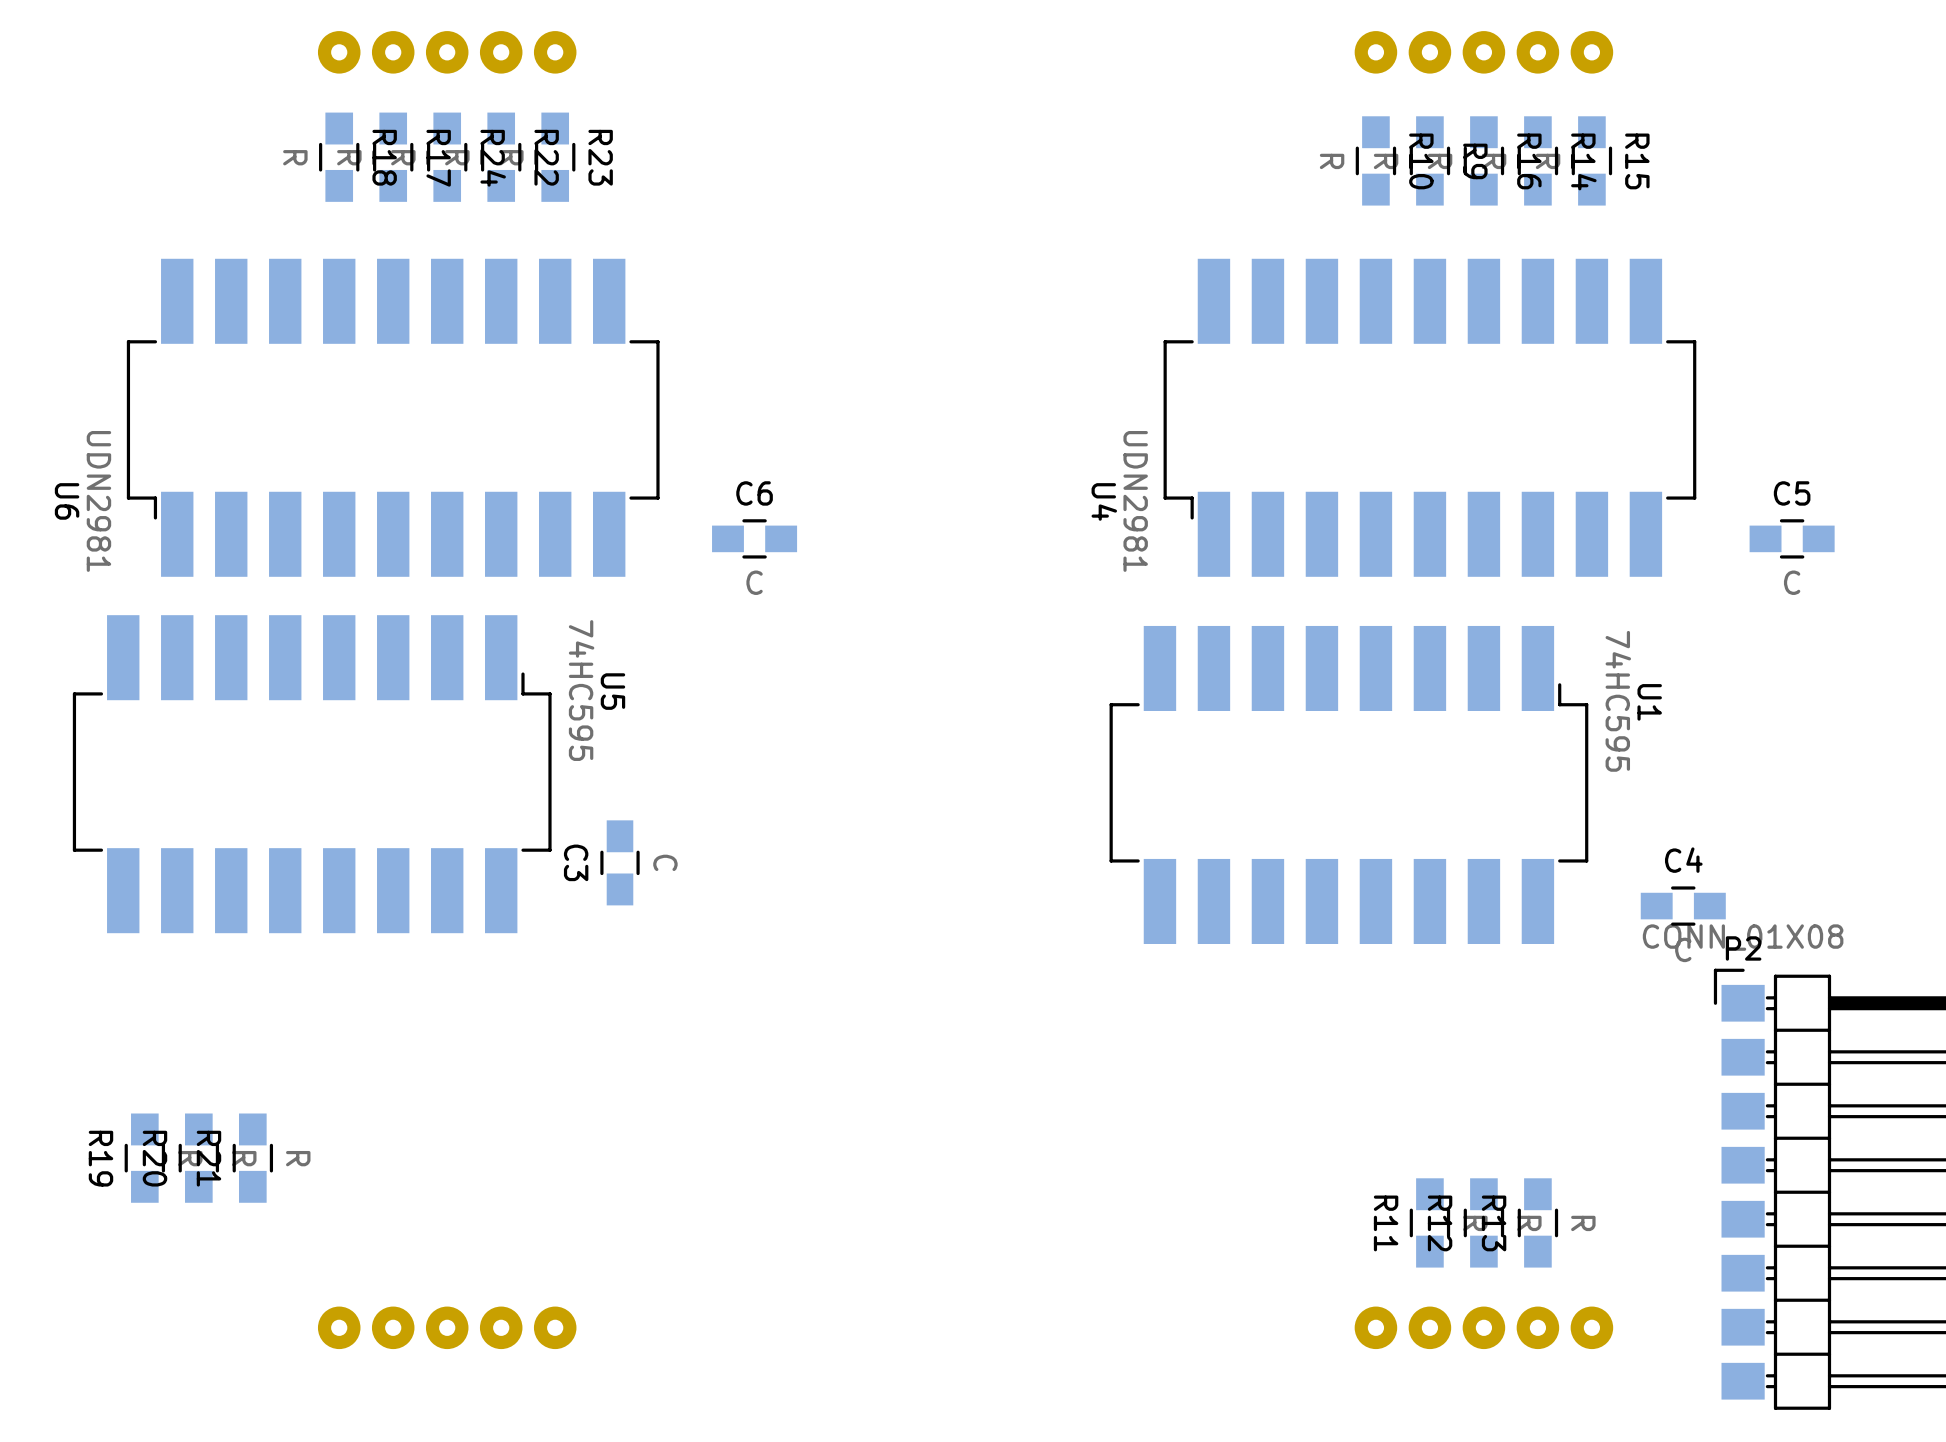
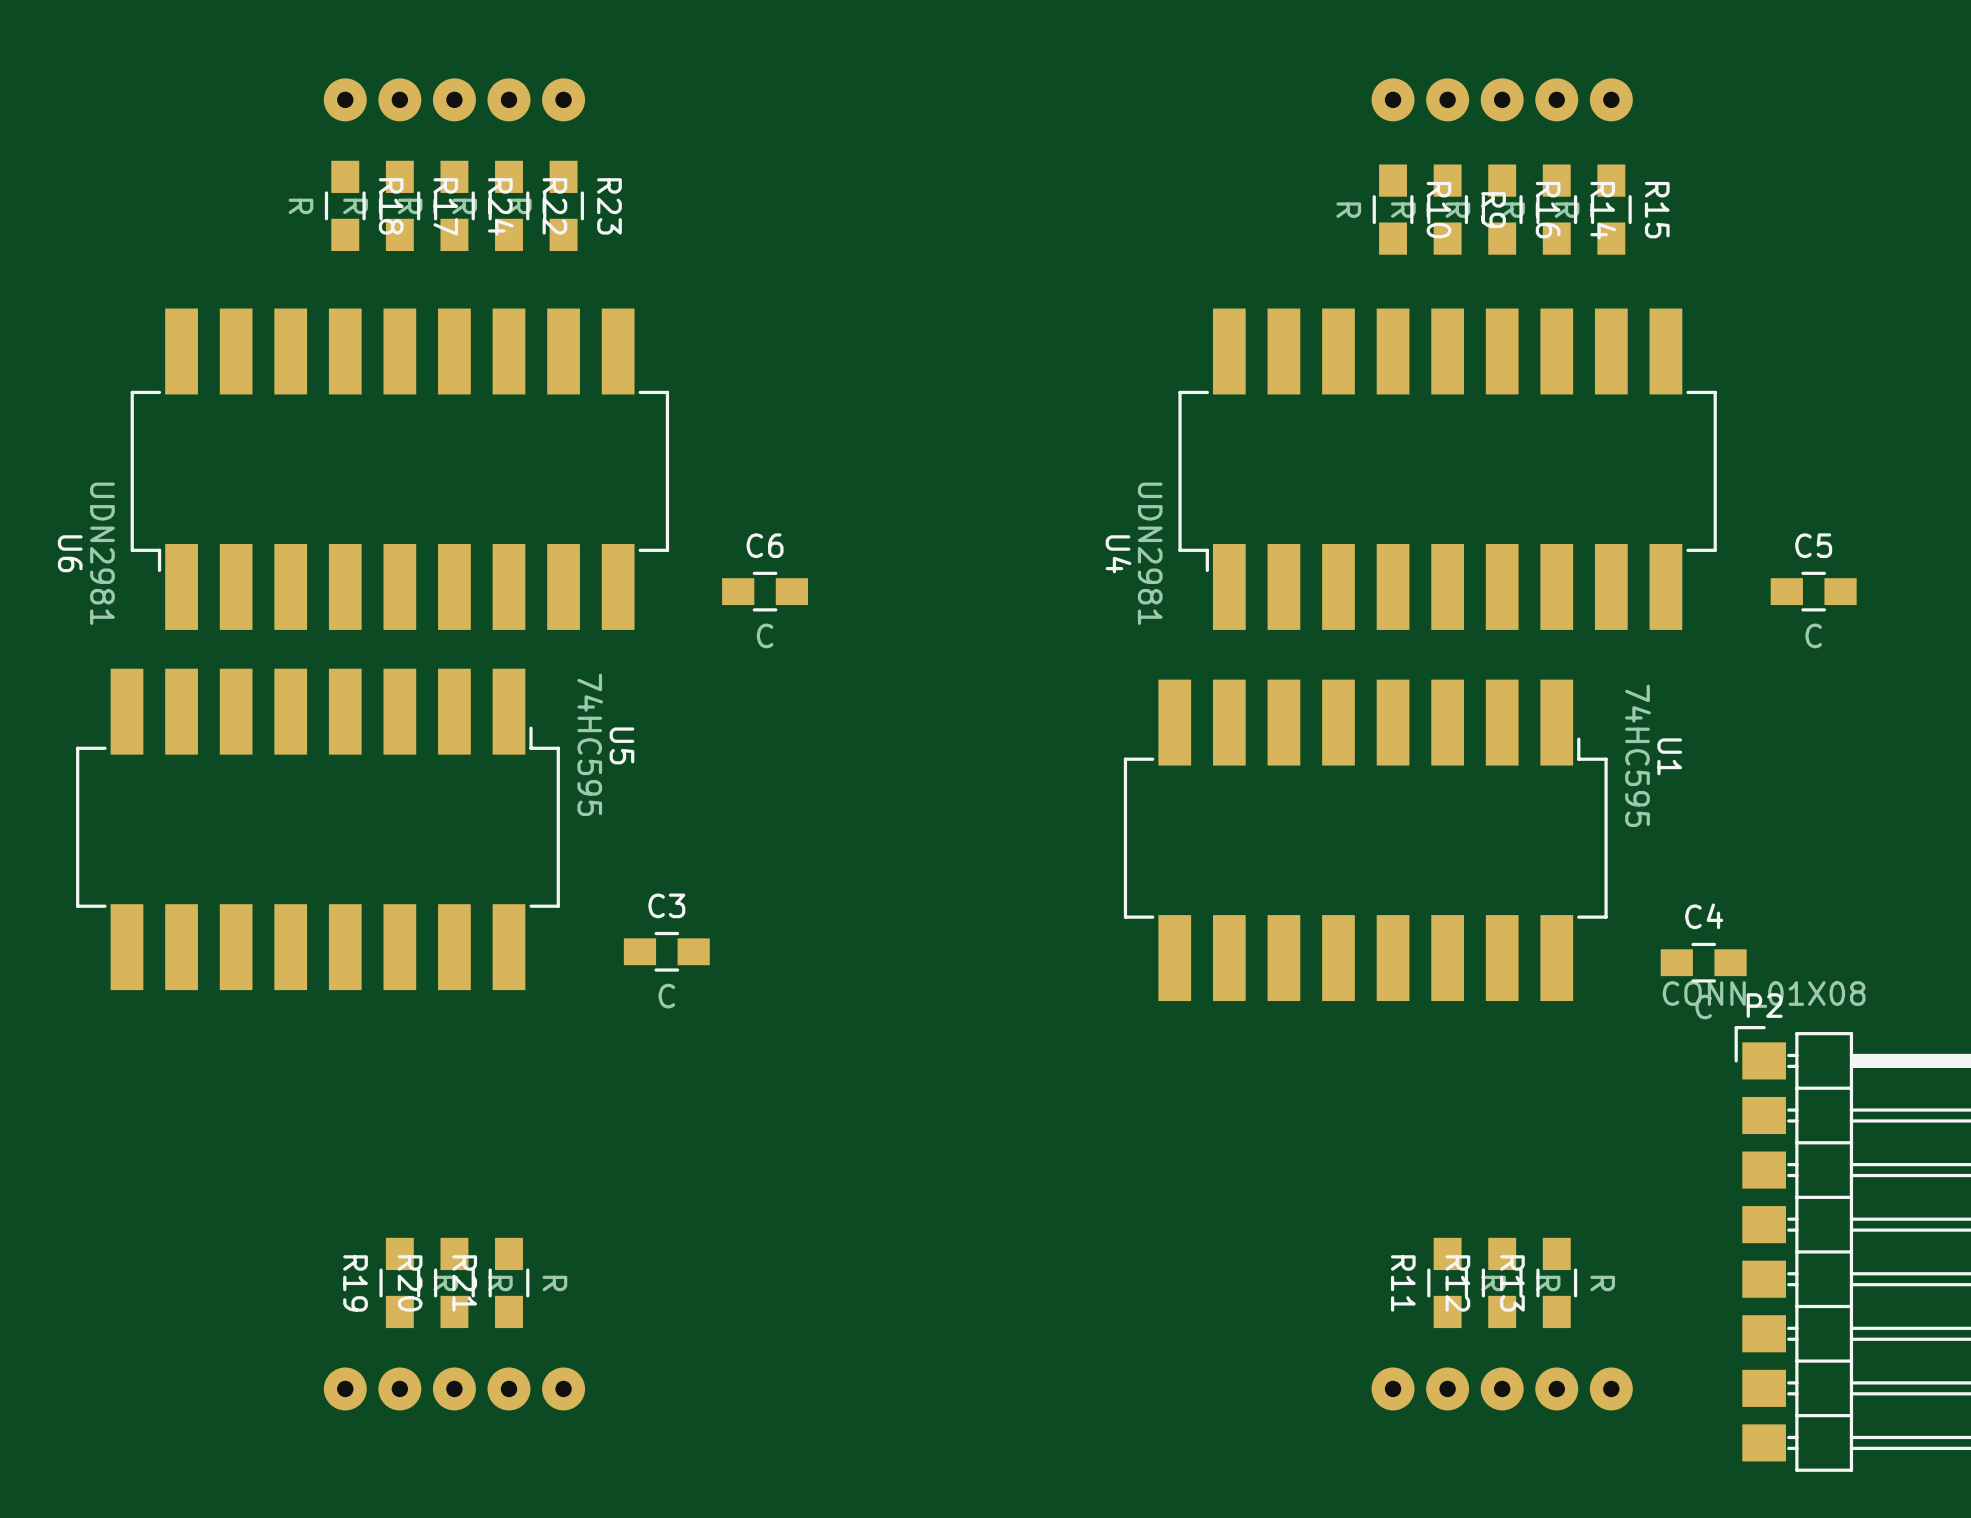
C3 rotation: 0° (619, 862) -> 90° clockwise (666, 951)
R19 position: (144, 1158) -> (399, 1282)
R20 position: (198, 1158) -> (454, 1282)
R21 position: (252, 1158) -> (509, 1282)

